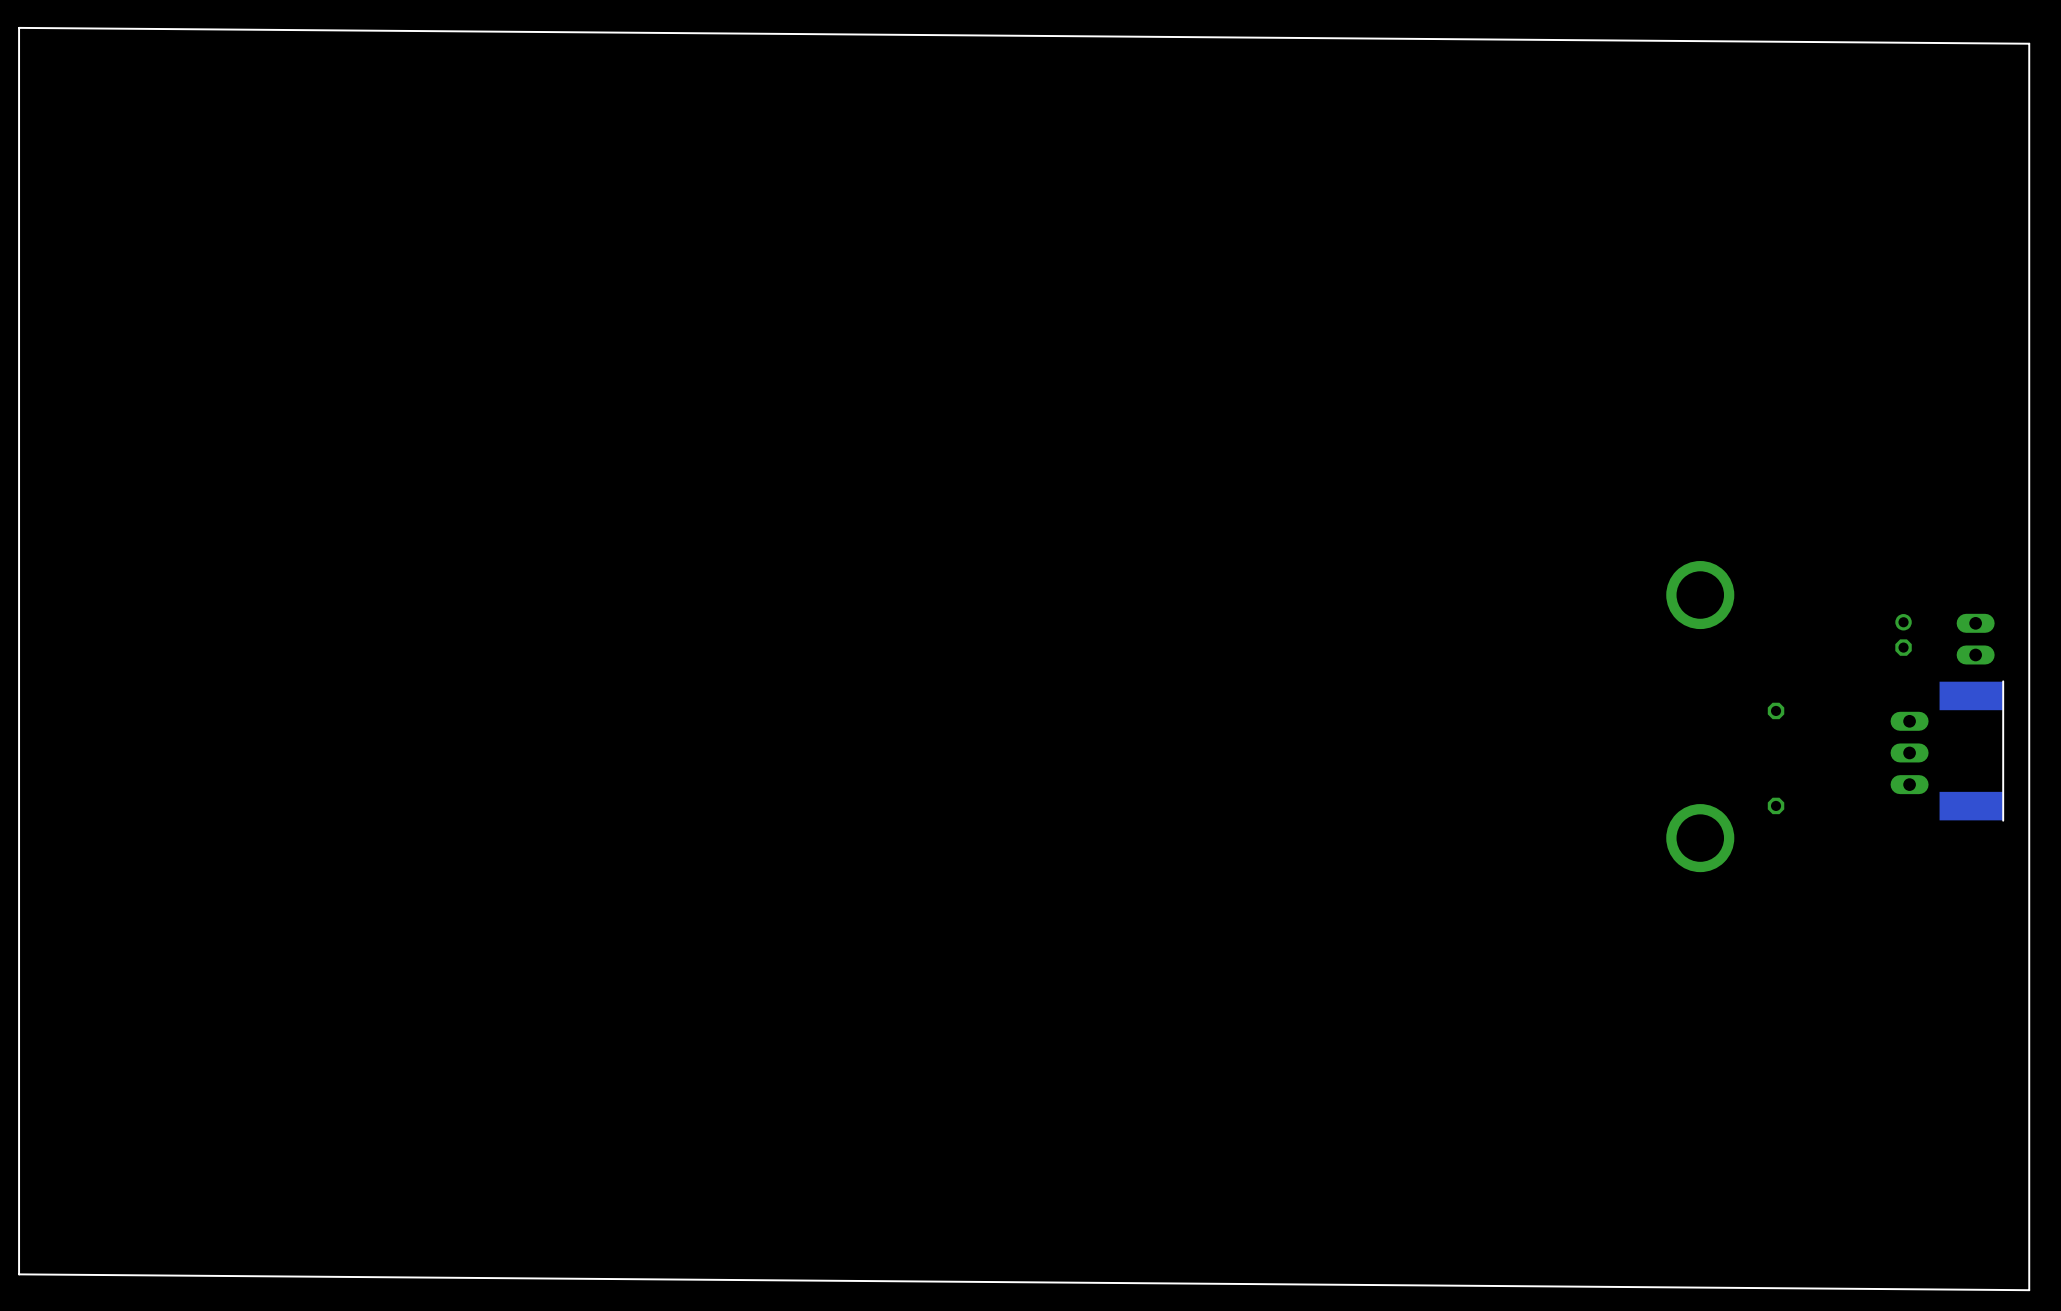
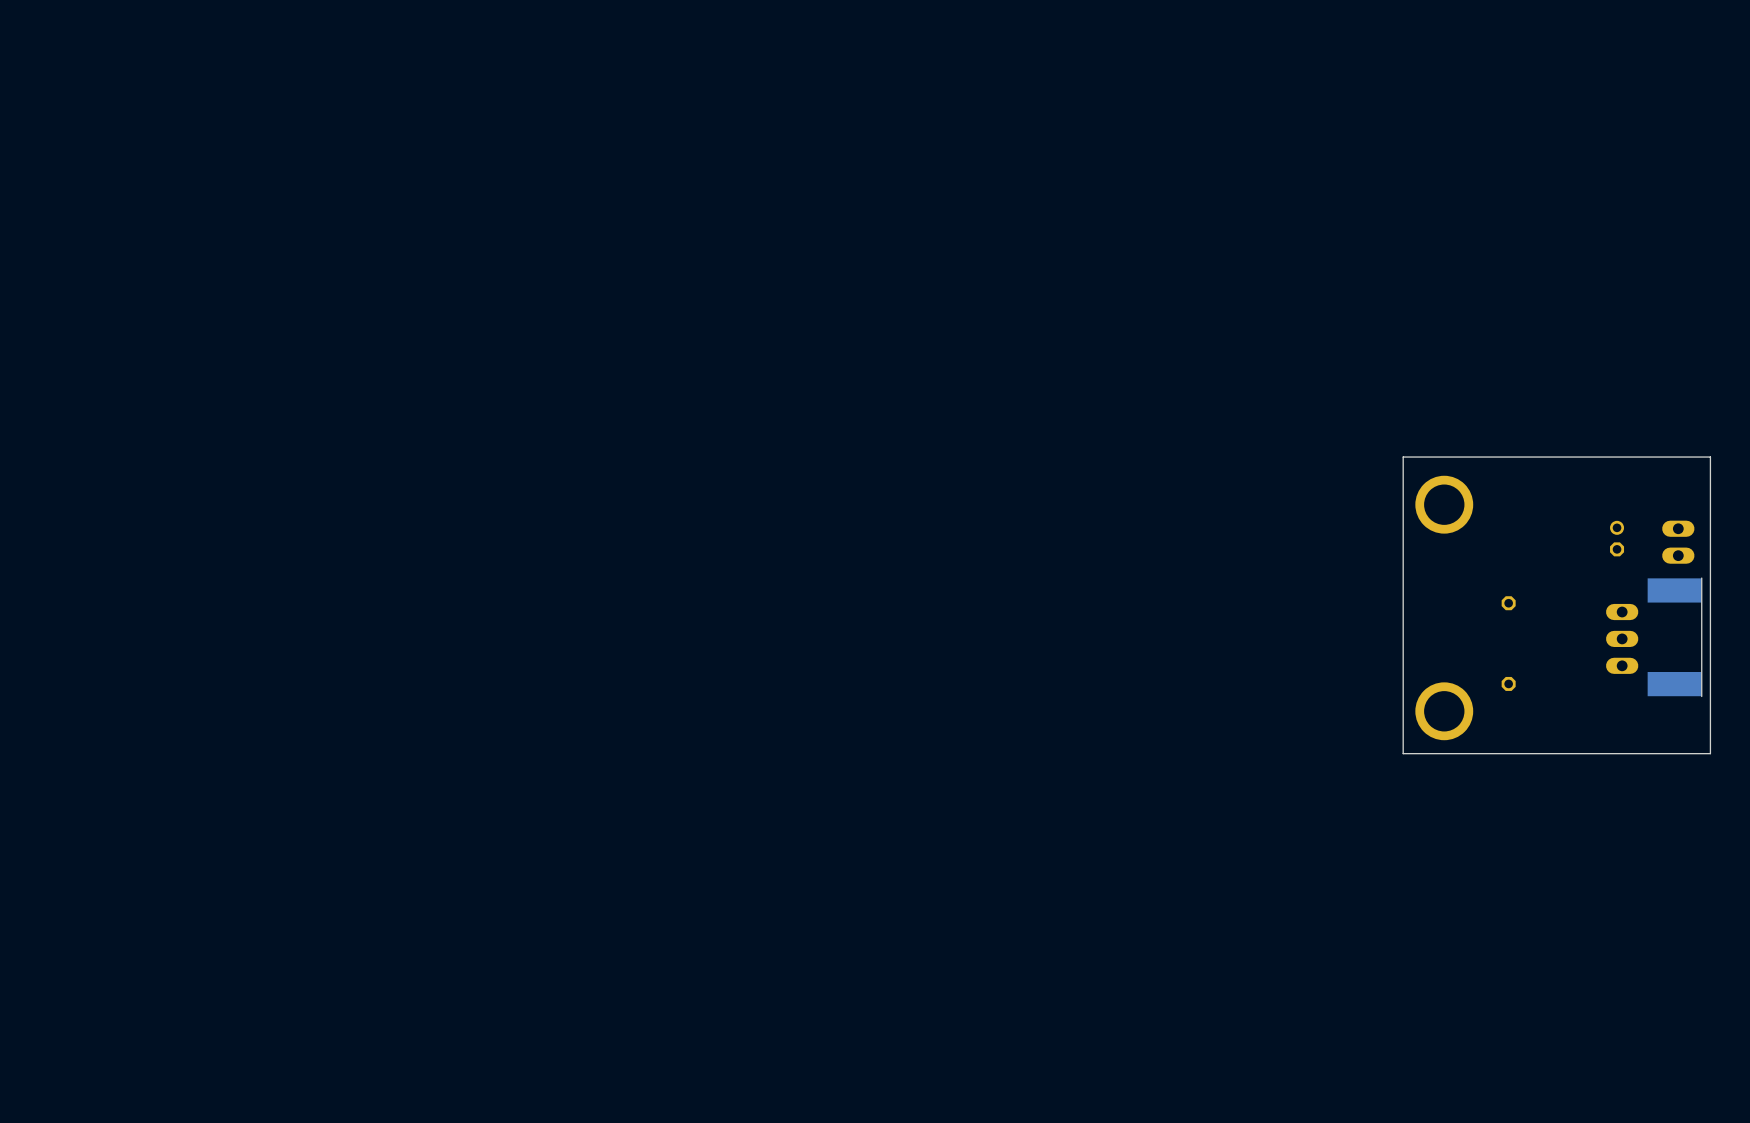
board edge: (19, 27) (19, 1274) (2029, 1290) (2029, 43) (19, 27) -> none
board edge: none -> (1710, 457) (1403, 457) (1403, 753) (1710, 753) (1710, 457)

